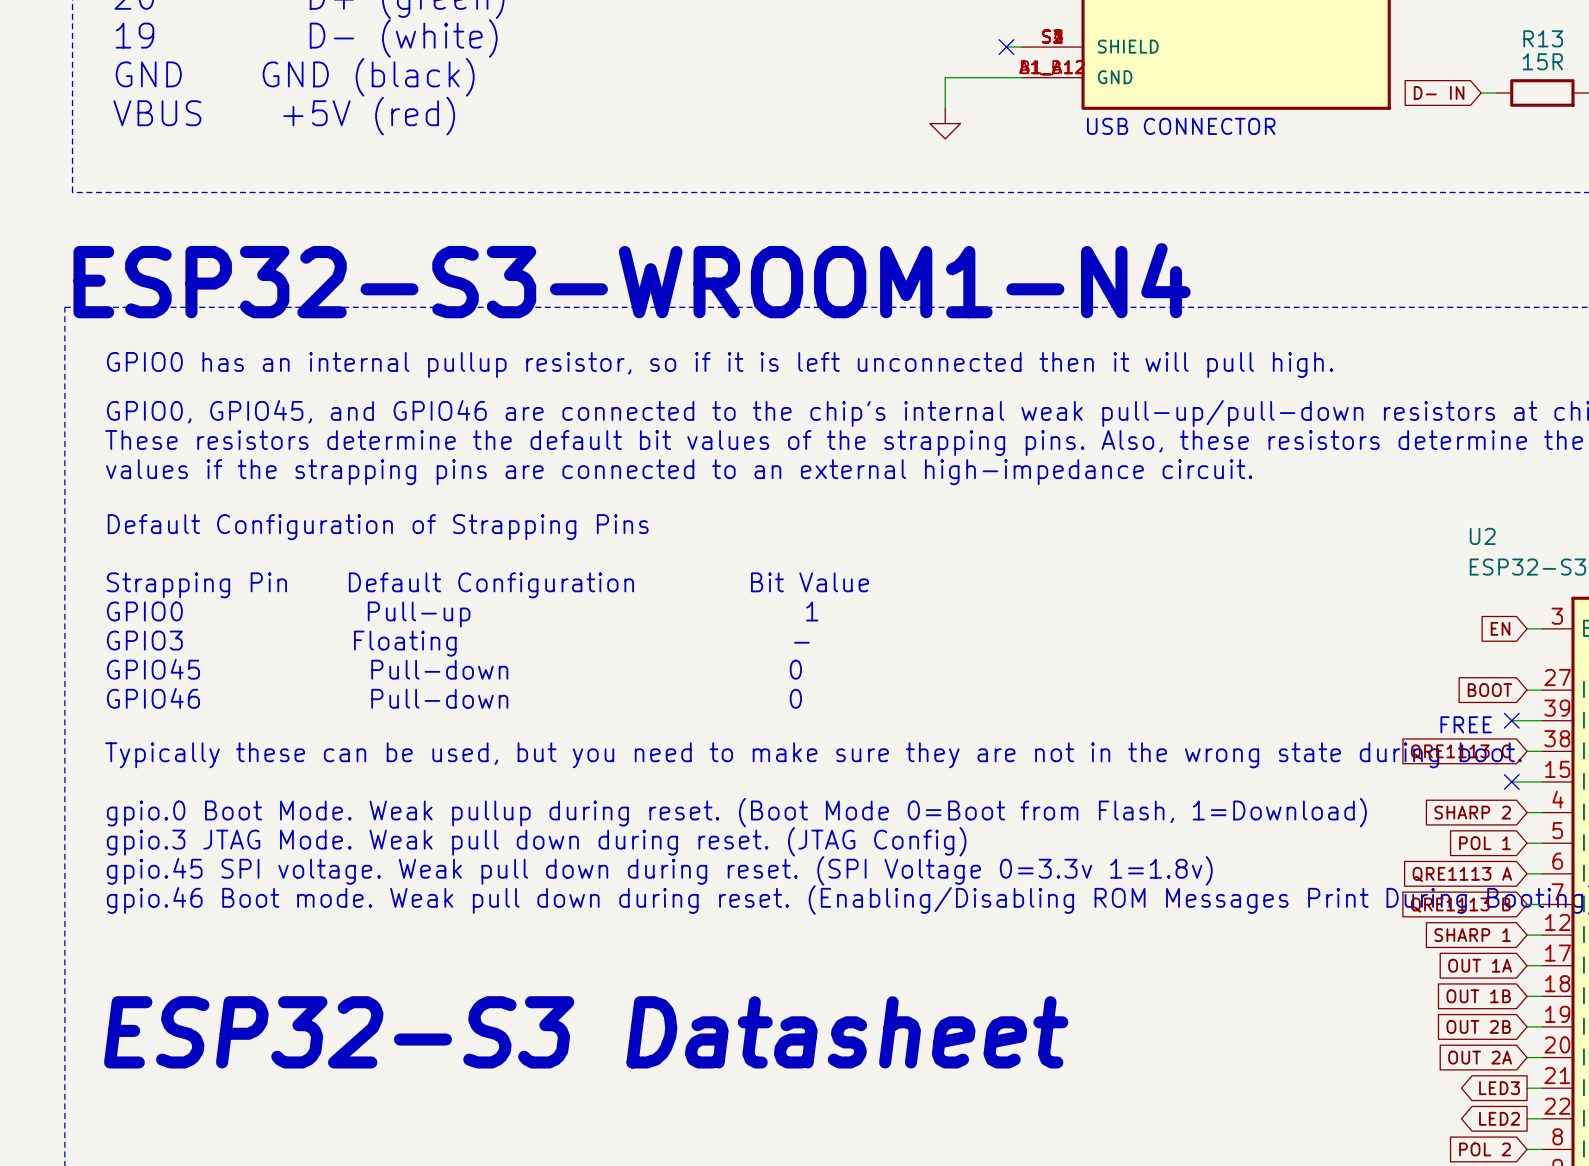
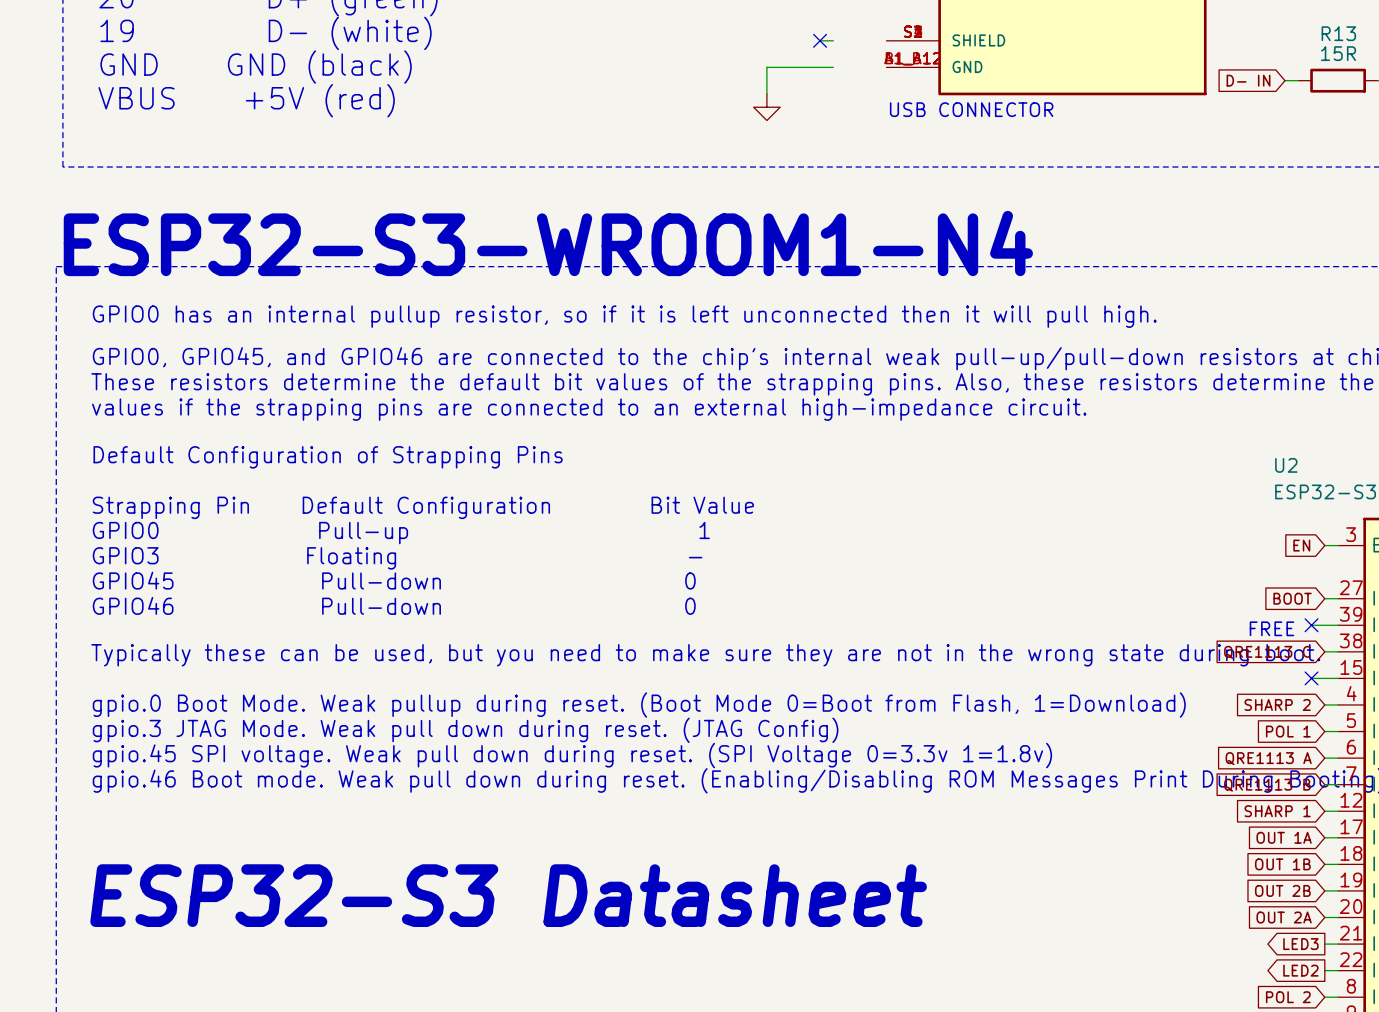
no-connect mark: none -> (820, 40)
wire: (1006, 47) (1021, 47) -> (820, 40) (833, 40)
no-connect mark: (1006, 47) -> none
wire: (945, 77) (945, 108) -> (820, 67) (766, 67) (766, 93)
wire: (960, 77) (1021, 77) -> none
power symbol position: (945, 123) -> (766, 107)
text position: USB CONNECTOR (1181, 126) -> USB CONNECTOR (971, 109)

